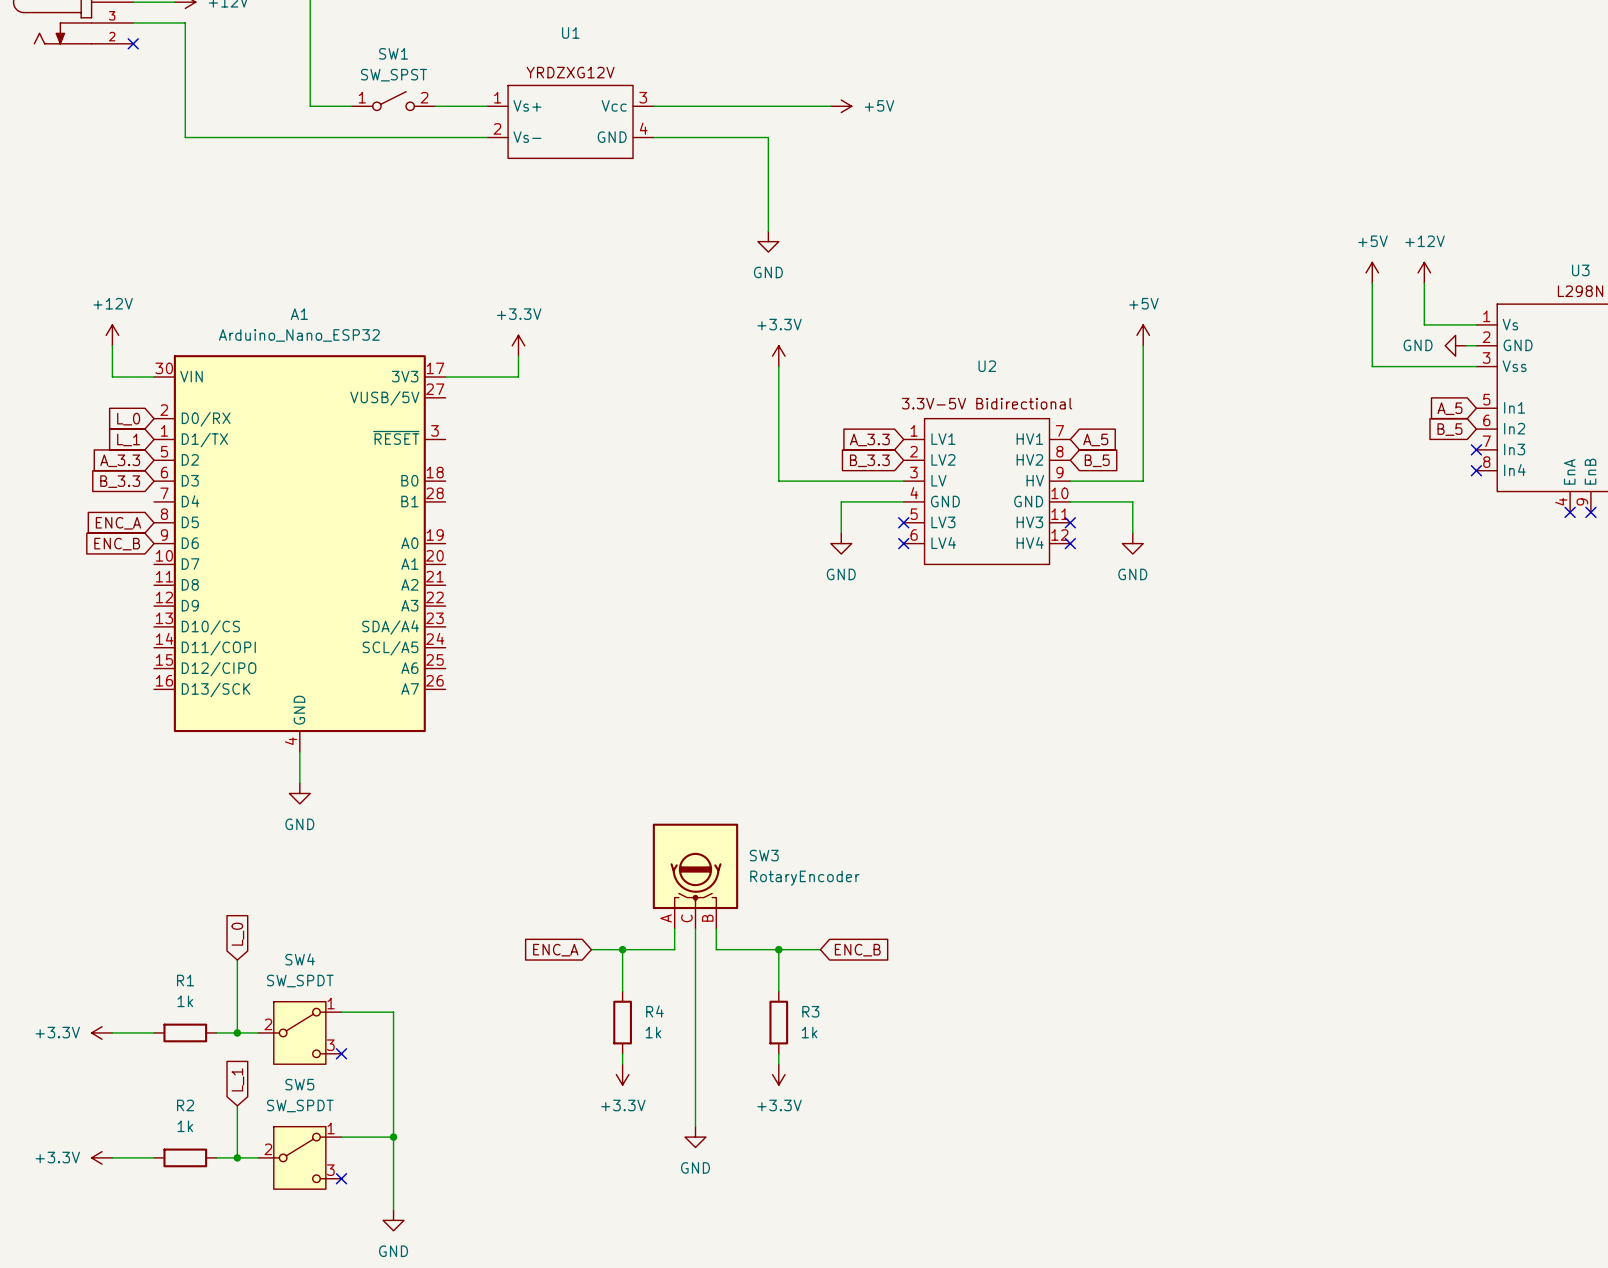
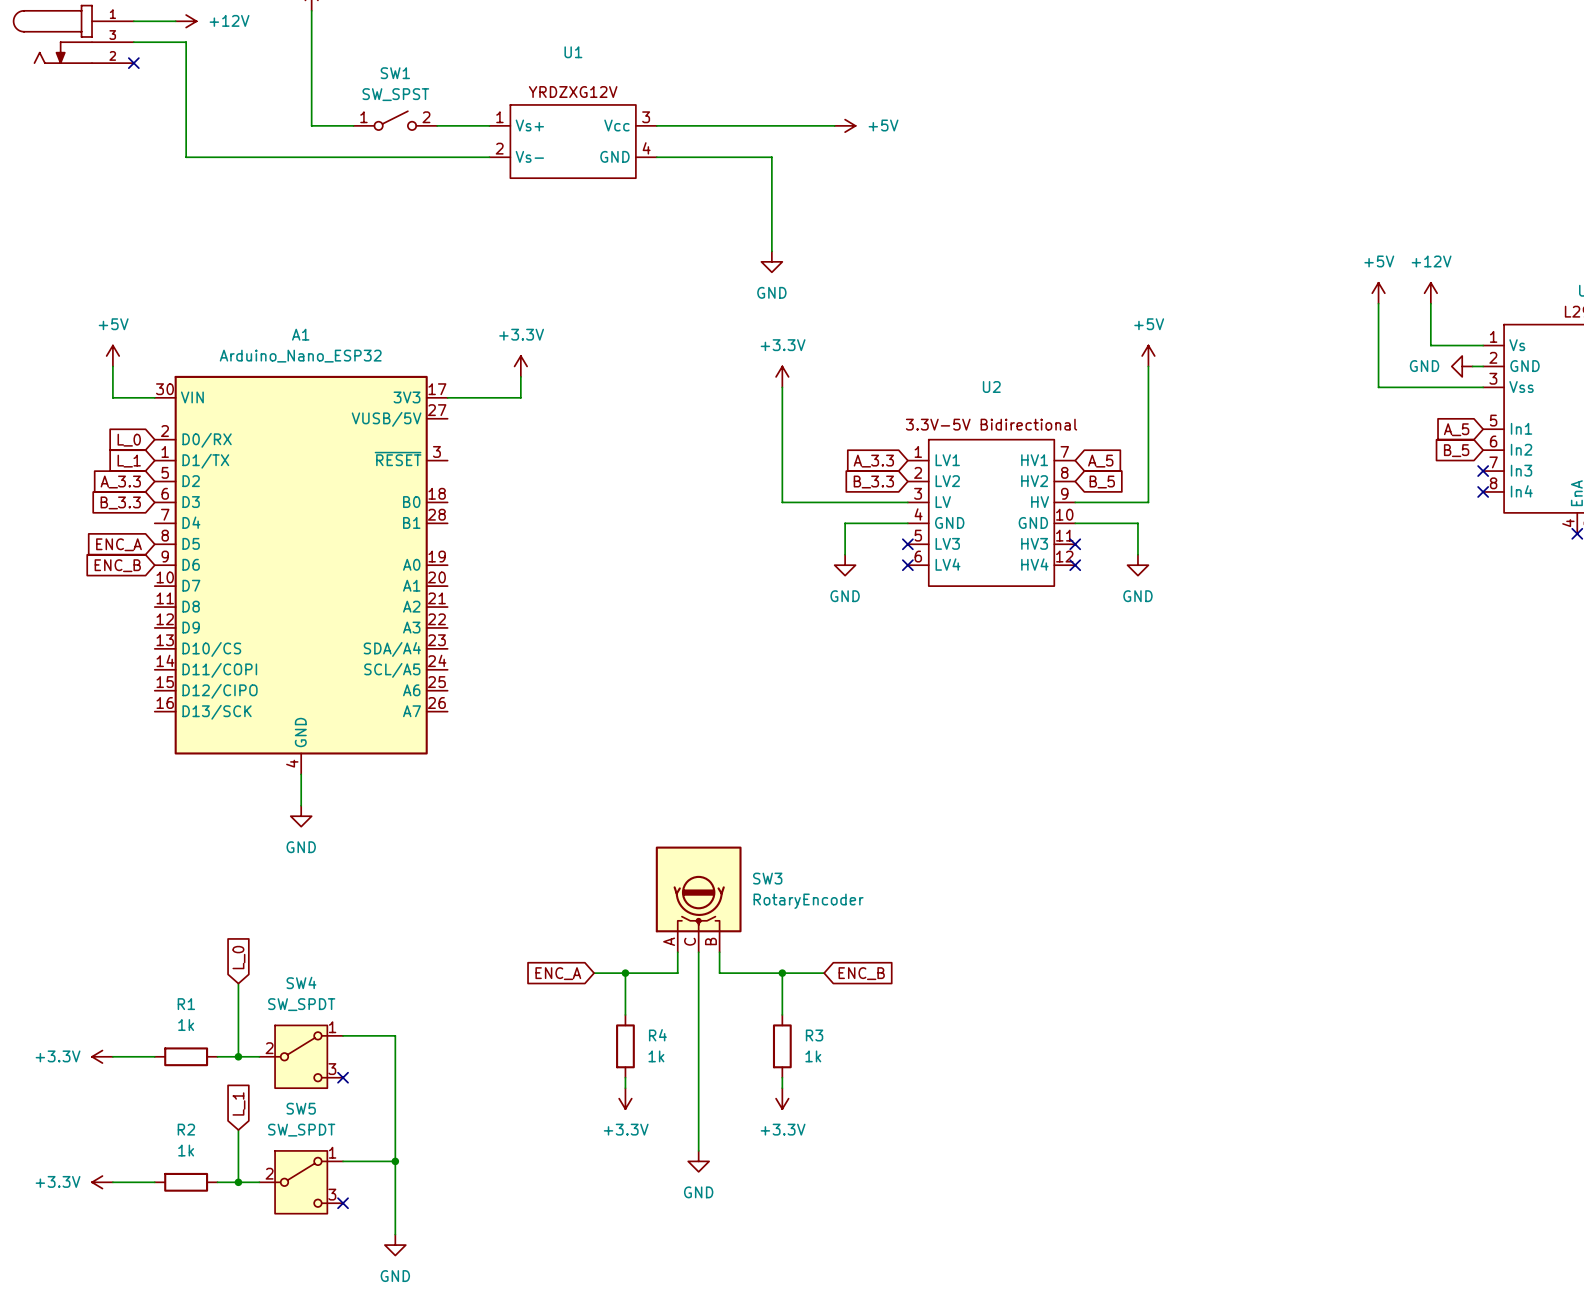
power symbol: +12V (112, 335) -> +5V (112, 356)

